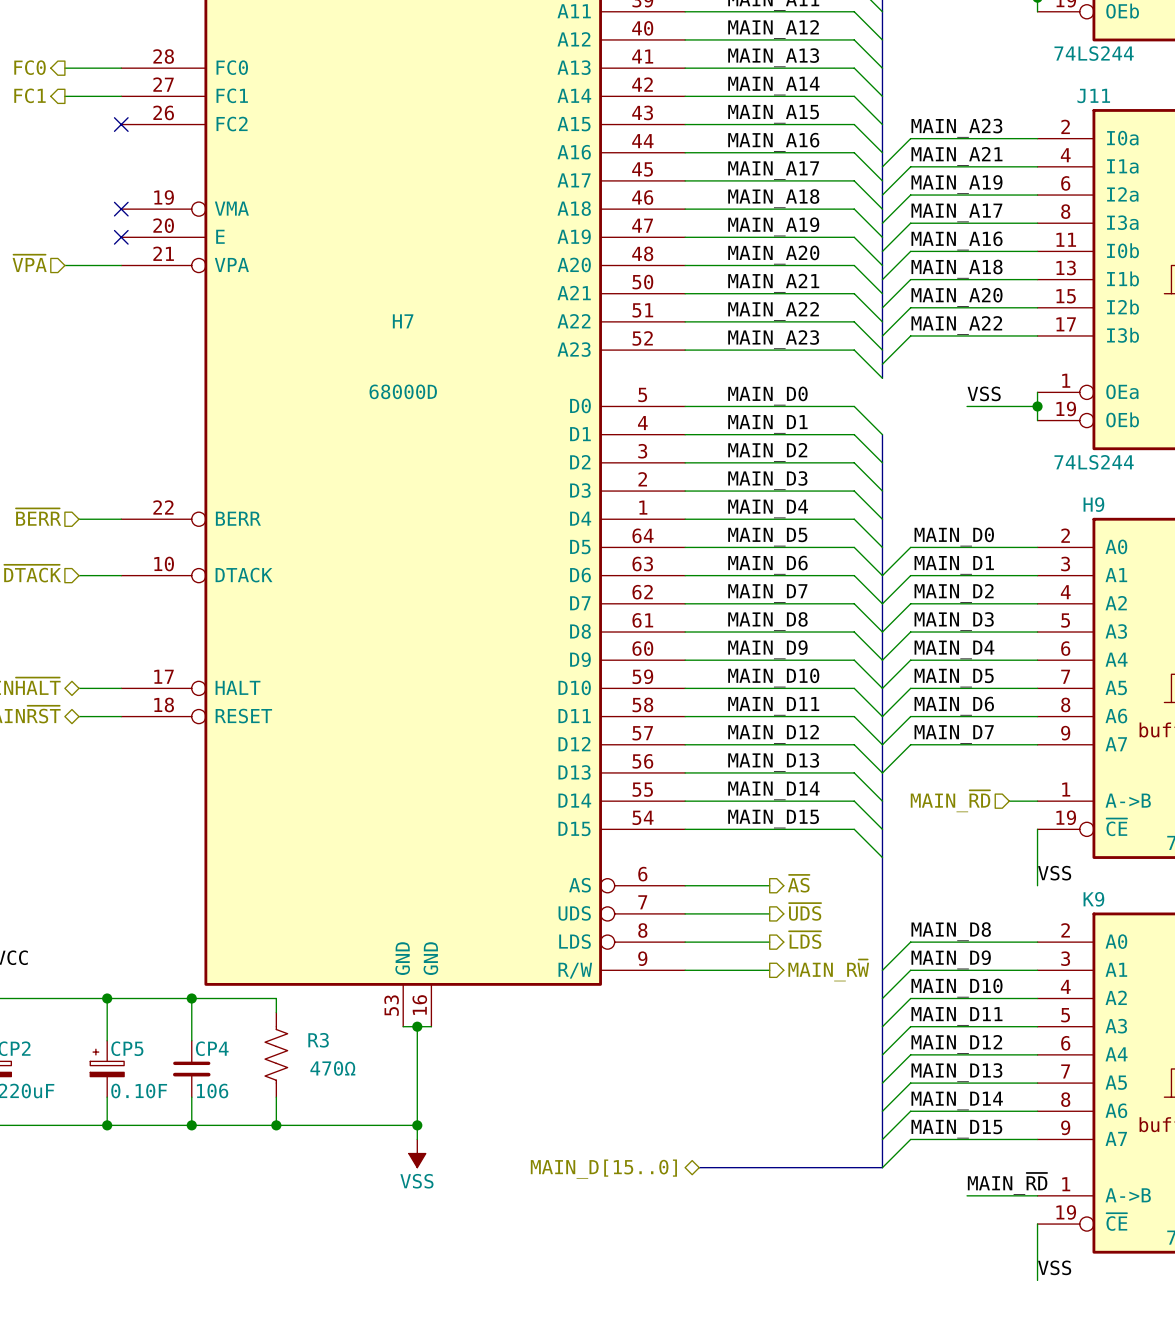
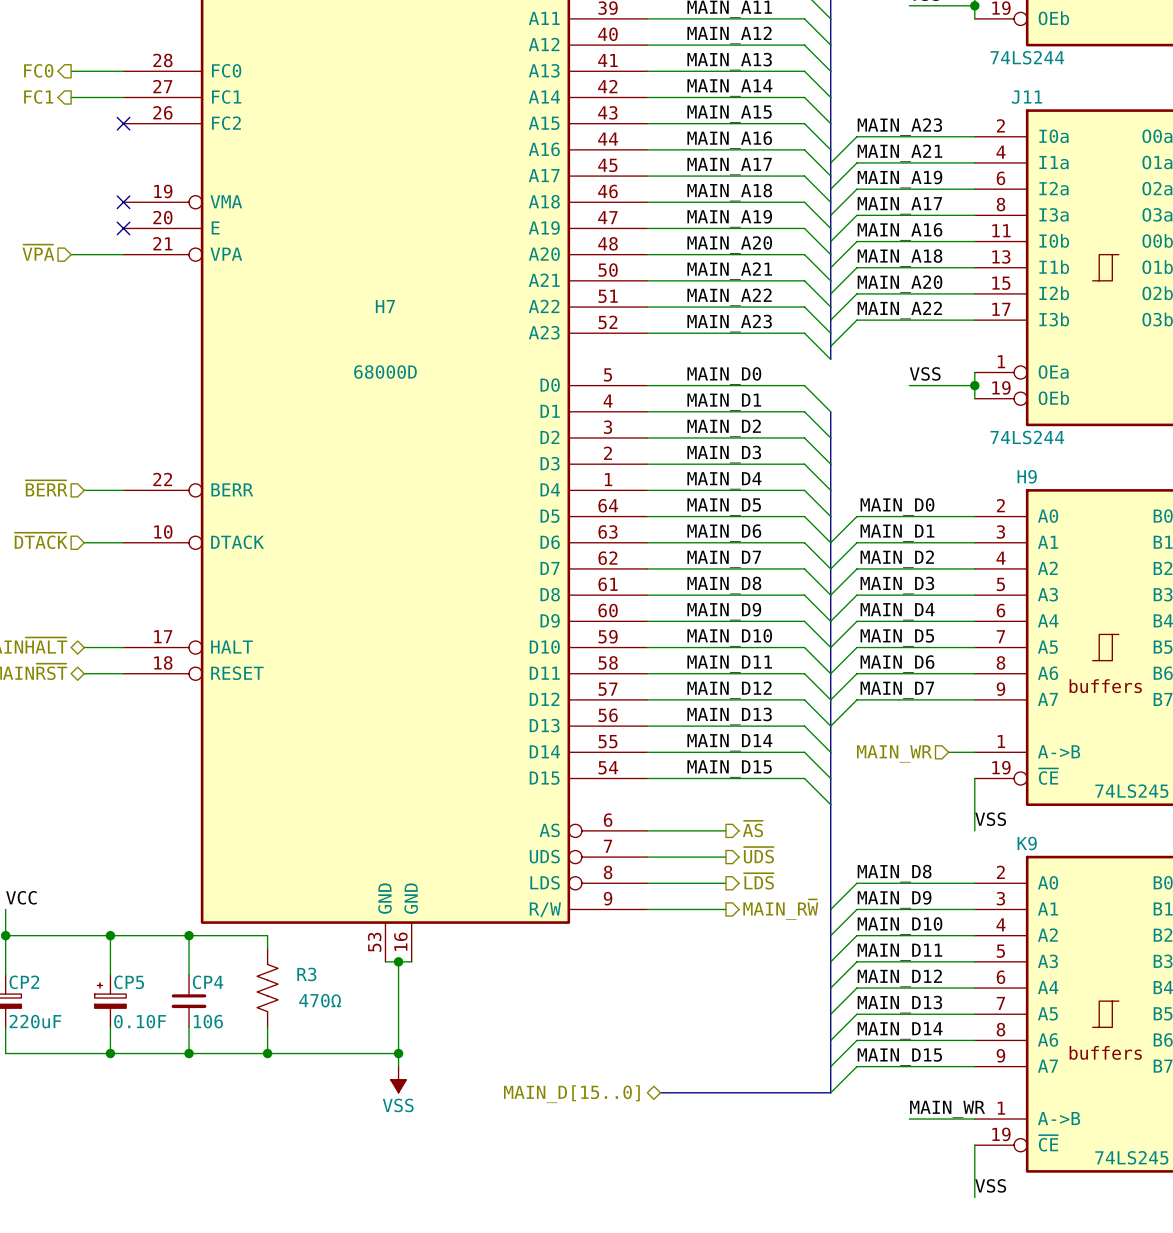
hierarchical label: MAIN_~{RD} (950, 801) -> MAIN_WR (894, 753)
label: MAIN_~{RD} (1007, 1183) -> MAIN_WR (947, 1109)

